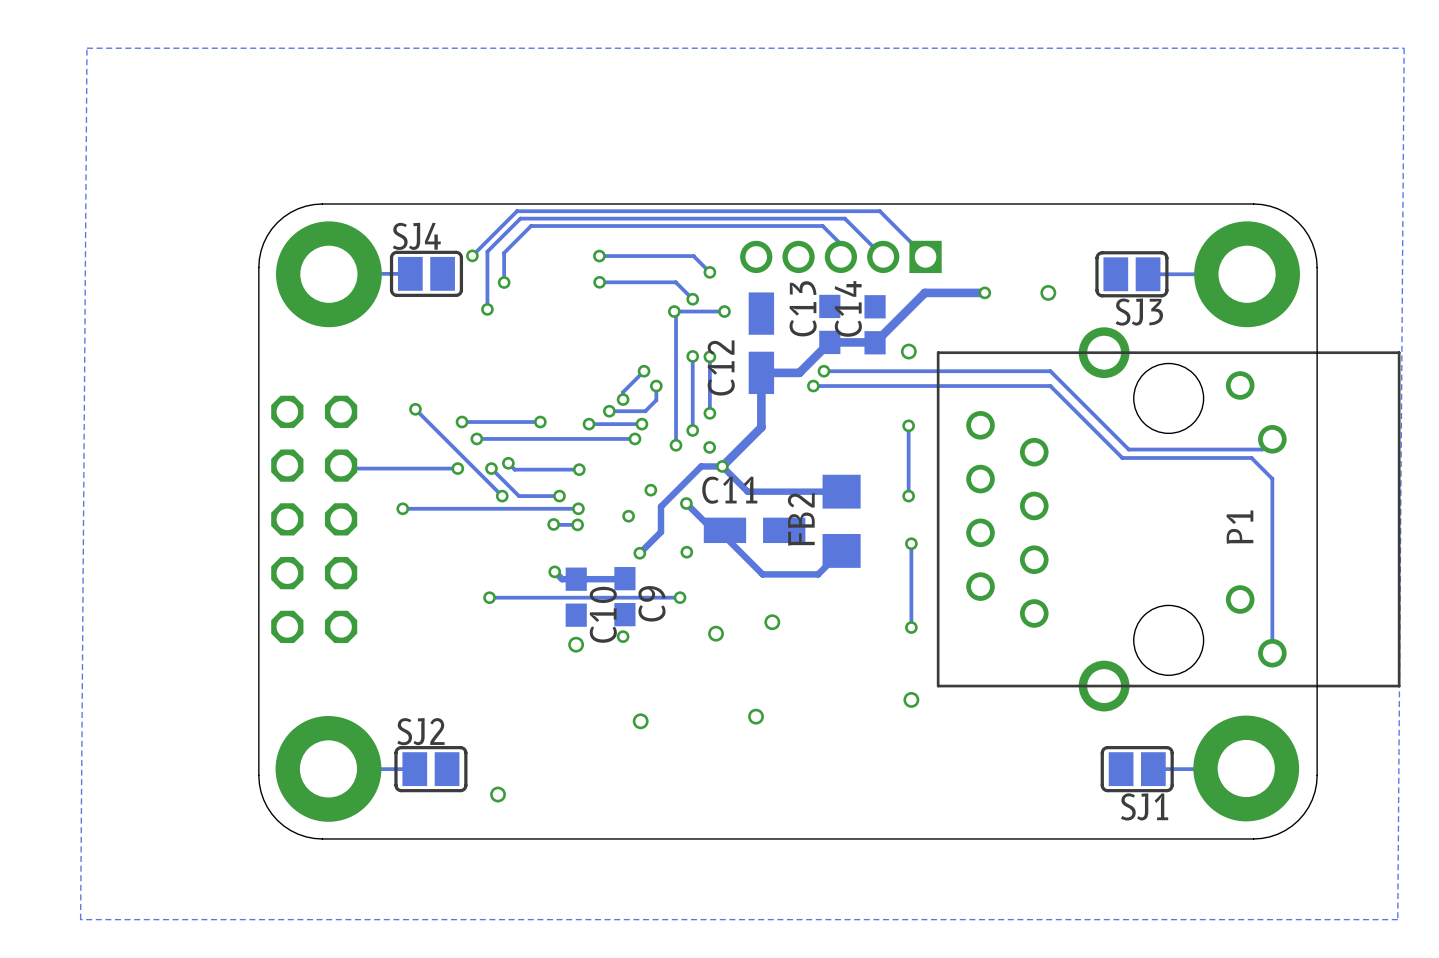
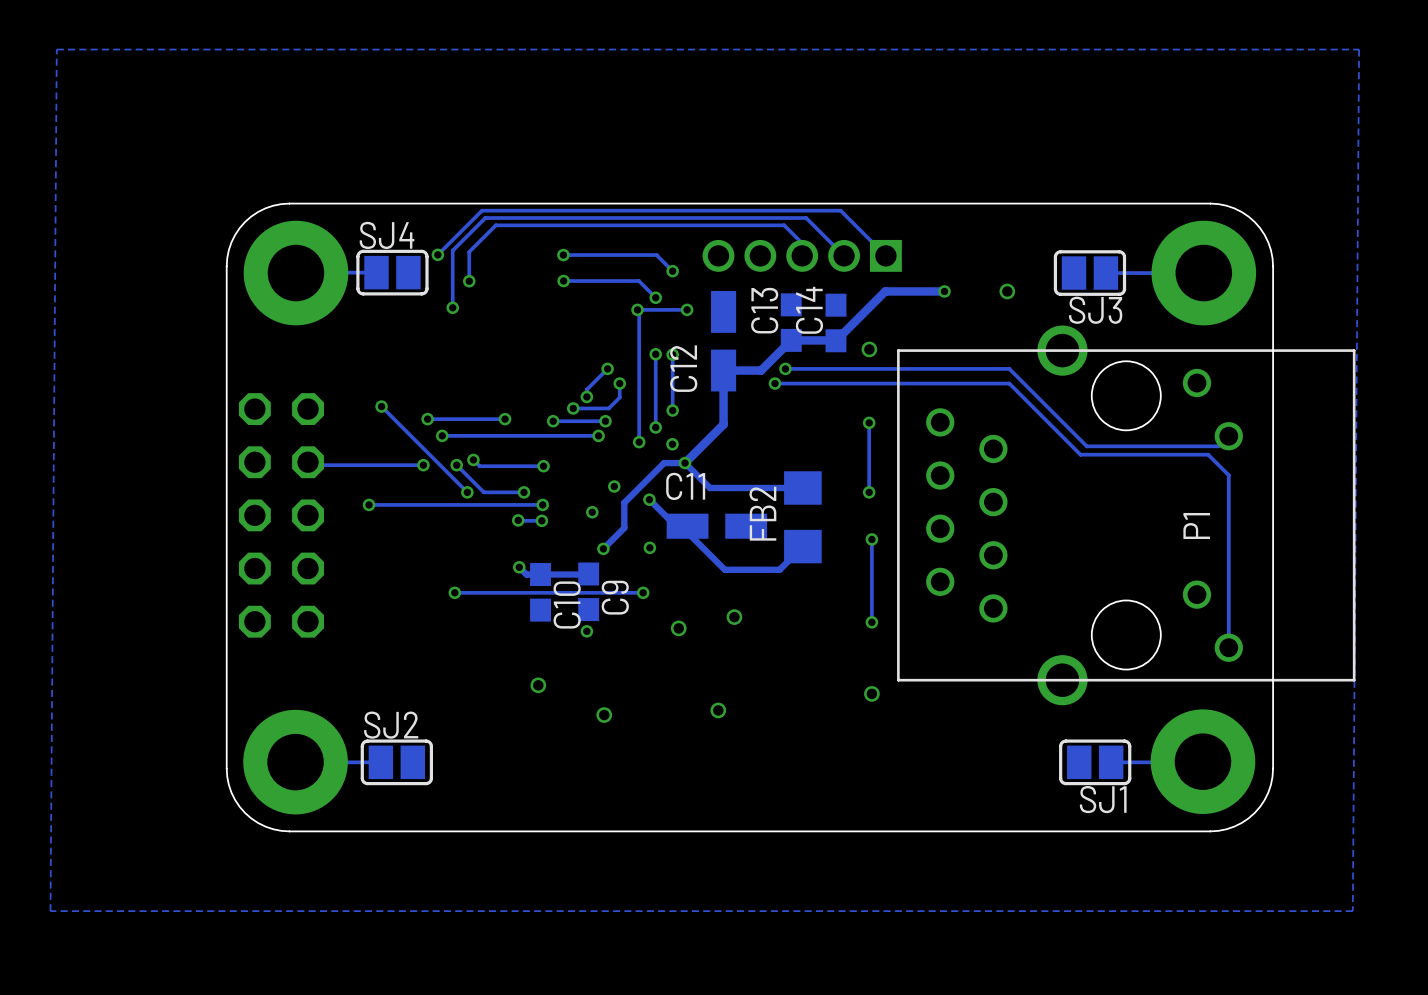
via position: (576, 644) -> (538, 685)
via: (498, 794) -> none

